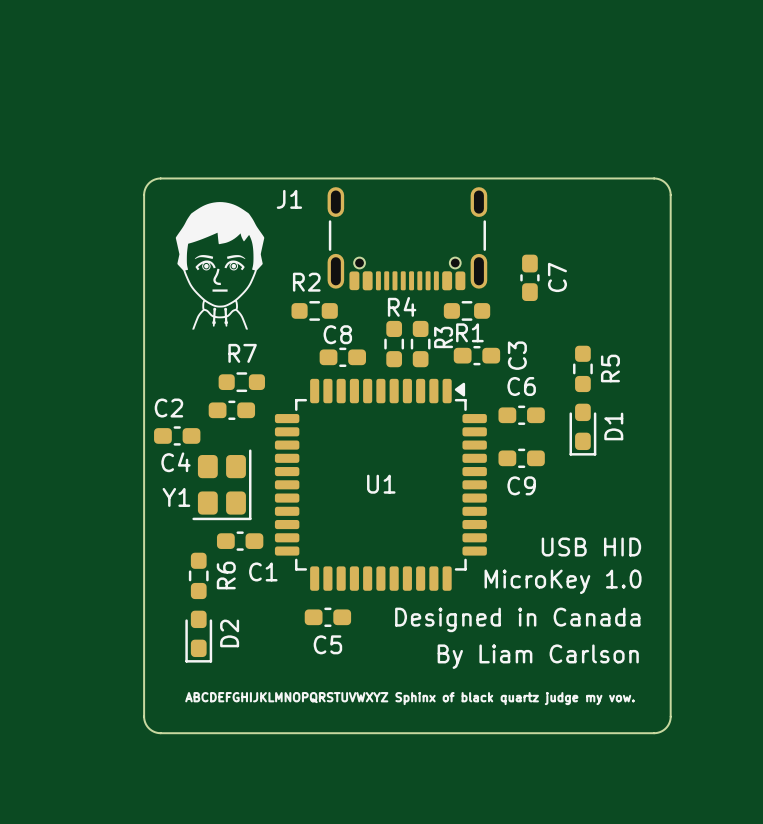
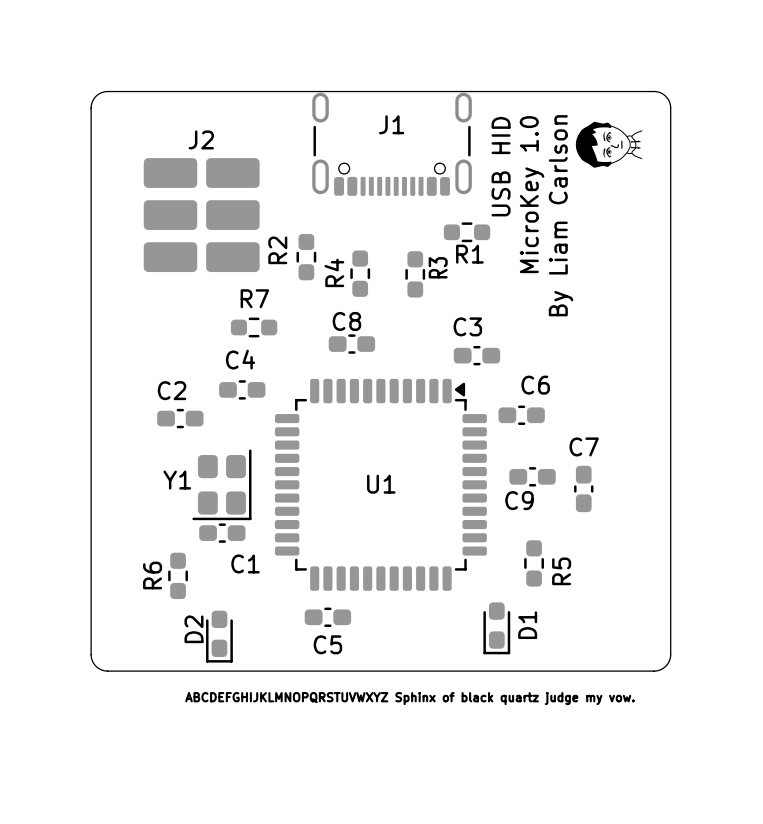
drawing: none -> [575, 121, 643, 168]
board edge: (670, 195) (665, 183) (654, 178) (160, 178) (148, 183) (144, 195) (144, 718) (148, 728) (160, 733) (655, 733) (665, 728) (670, 720) (670, 654) -> (670, 195) (670, 106) (665, 96) (655, 91) (107, 91) (95, 96) (91, 106) (91, 654) (95, 666) (107, 671) (654, 671) (665, 666) (670, 654)
J1 name position: J1 (289, 199) -> J1 (391, 124)
drawing: [175, 202, 265, 330] -> none
J2: none -> (201, 215)
text: none -> By Liam Carlson (561, 215)
J1 position: (407, 238) -> (392, 144)
C7 position: (529, 277) -> (583, 488)
C7 name rotation: 0° (557, 277) -> 90° clockwise (584, 446)
C7 name position: C7 (557, 277) -> C7 (584, 446)
R4 name rotation: 0° (402, 306) -> 90° counterclockwise (334, 272)
R4 name position: R4 (402, 306) -> R4 (334, 272)
R2 rotation: 0° (314, 310) -> 90° clockwise (306, 257)
R2 position: (314, 310) -> (306, 257)
R1 position: (467, 310) -> (467, 232)
R4 position: (394, 344) -> (360, 273)
R3 position: (420, 344) -> (415, 274)
C3 name rotation: 0° (517, 355) -> 90° clockwise (467, 326)
C3 name position: C3 (517, 355) -> C3 (467, 326)
C8 position: (342, 357) -> (351, 344)
R5 position: (582, 368) -> (534, 563)
R5 name position: R5 (610, 368) -> R5 (561, 571)
R7 position: (241, 382) -> (254, 327)
C6 name position: C6 (521, 386) -> C6 (535, 385)
C4 position: (231, 410) -> (242, 389)
D1 position: (582, 429) -> (496, 628)
C2 position: (177, 435) -> (180, 418)
C9 position: (521, 458) -> (532, 476)
C4 name position: C4 (175, 462) -> C4 (240, 359)
C9 name position: C9 (521, 485) -> C9 (519, 500)
Y1 name position: Y1 (176, 497) -> Y1 (177, 480)
C1 position: (240, 541) -> (222, 533)
text rotation: 0° (591, 547) -> 90° counterclockwise (501, 166)
text position: USB HID (591, 547) -> USB HID (501, 166)
R6 position: (198, 575) -> (178, 575)
R6 name position: R6 (226, 575) -> R6 (152, 575)
text rotation: 0° (563, 581) -> 90° counterclockwise (532, 194)
text position: MicroKey 1.0 (563, 581) -> MicroKey 1.0 (532, 194)
text: Designed in Canada (517, 619) -> none
D2 name position: D2 (229, 633) -> D2 (193, 629)
D2 position: (198, 636) -> (219, 636)
text: By Liam Carlson (538, 656) -> none

